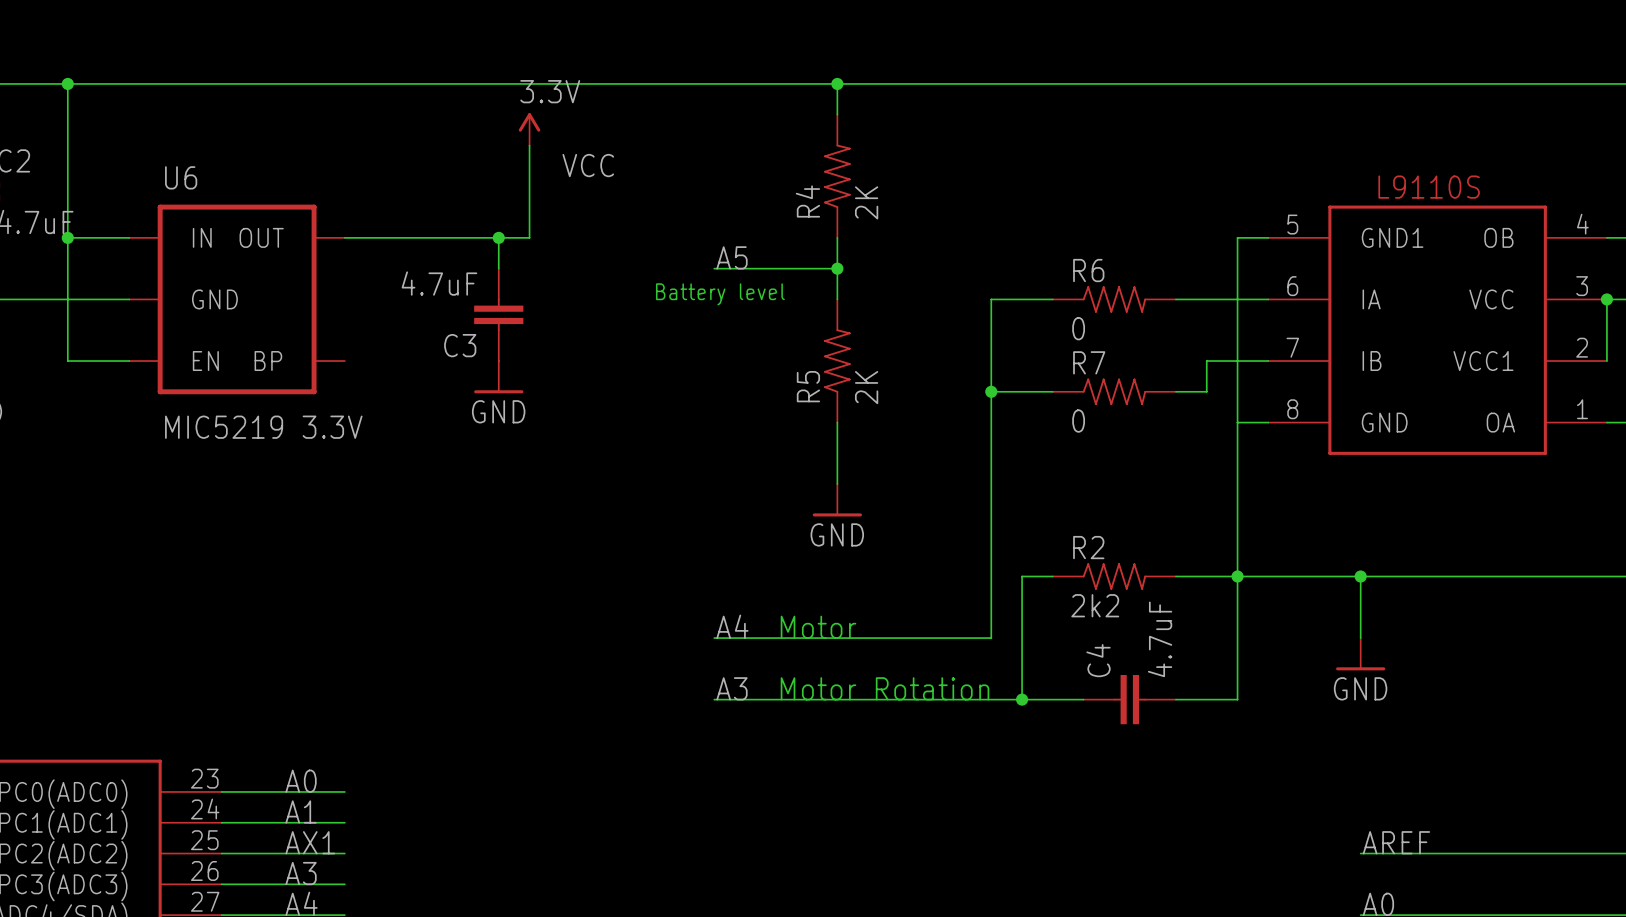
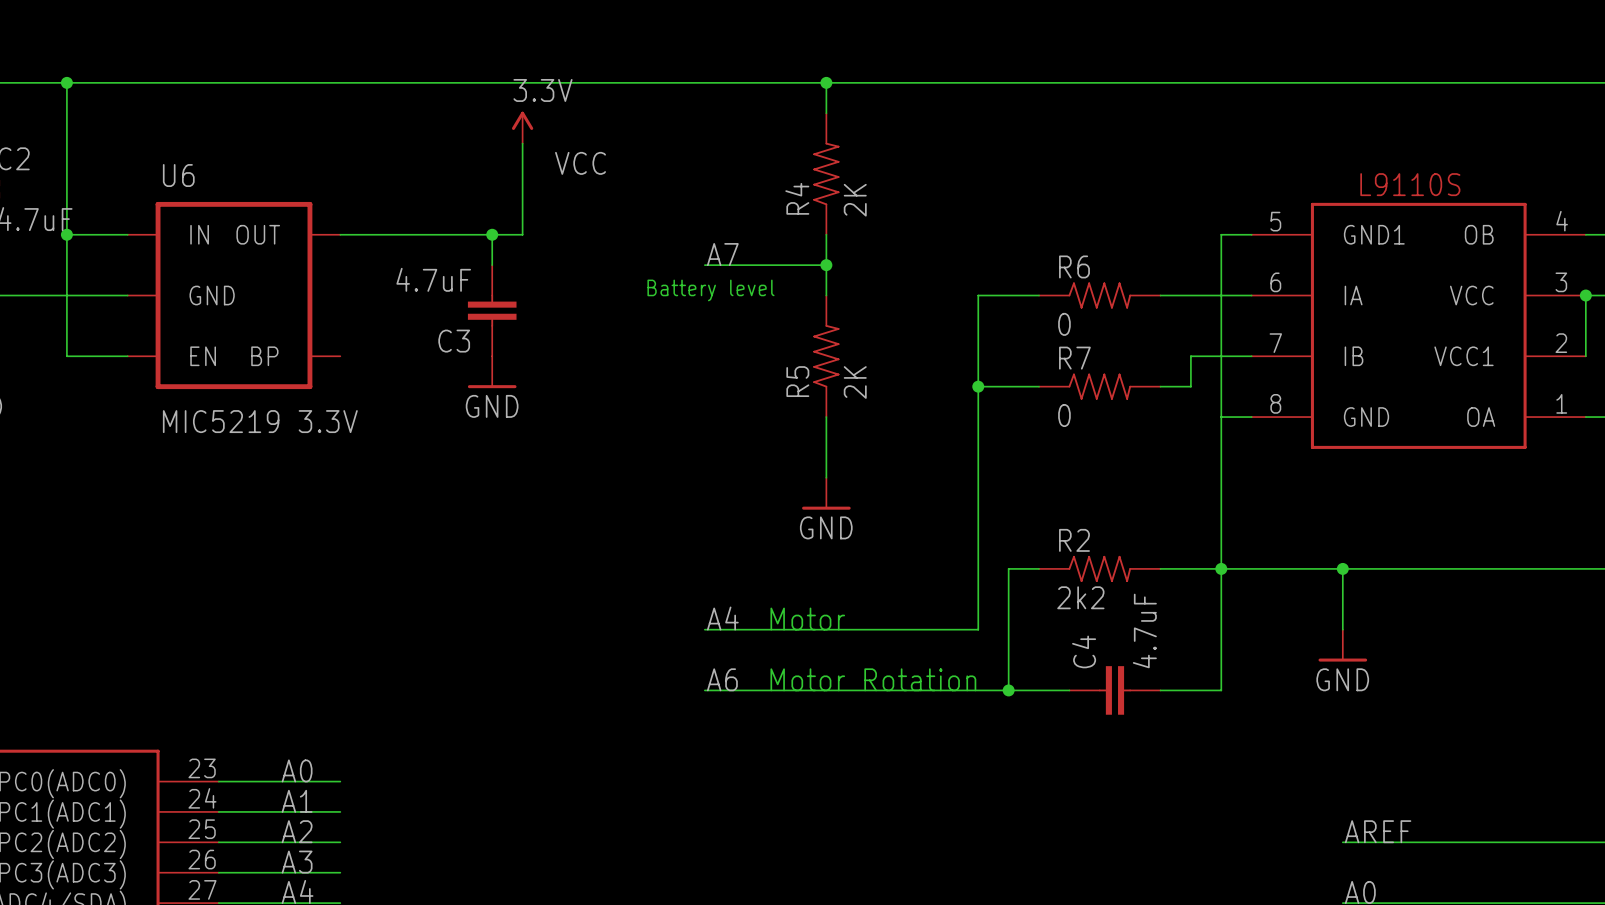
label: A5 (732, 257) -> A7 (722, 254)
label: A3 (732, 688) -> A6 (722, 679)
label: AX1 (310, 842) -> A2 (297, 831)

